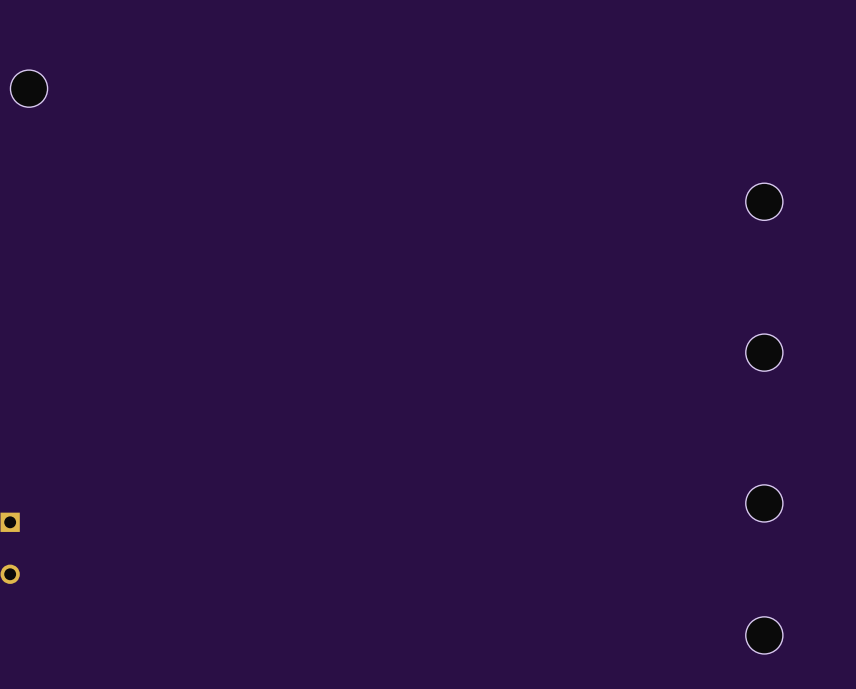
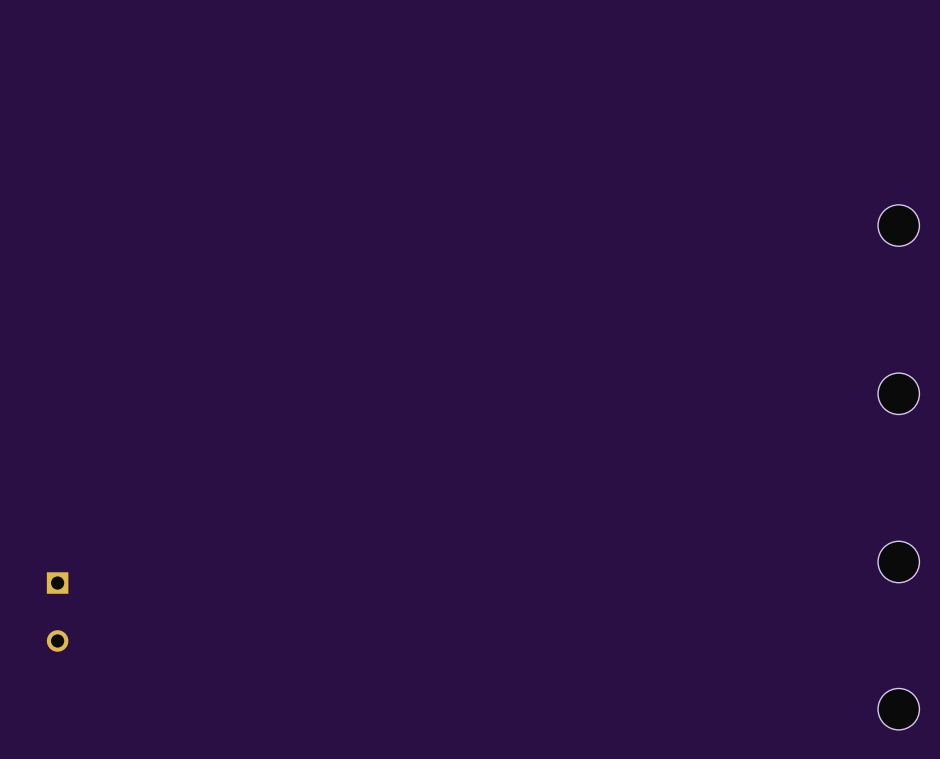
part: (29, 88) -> none

